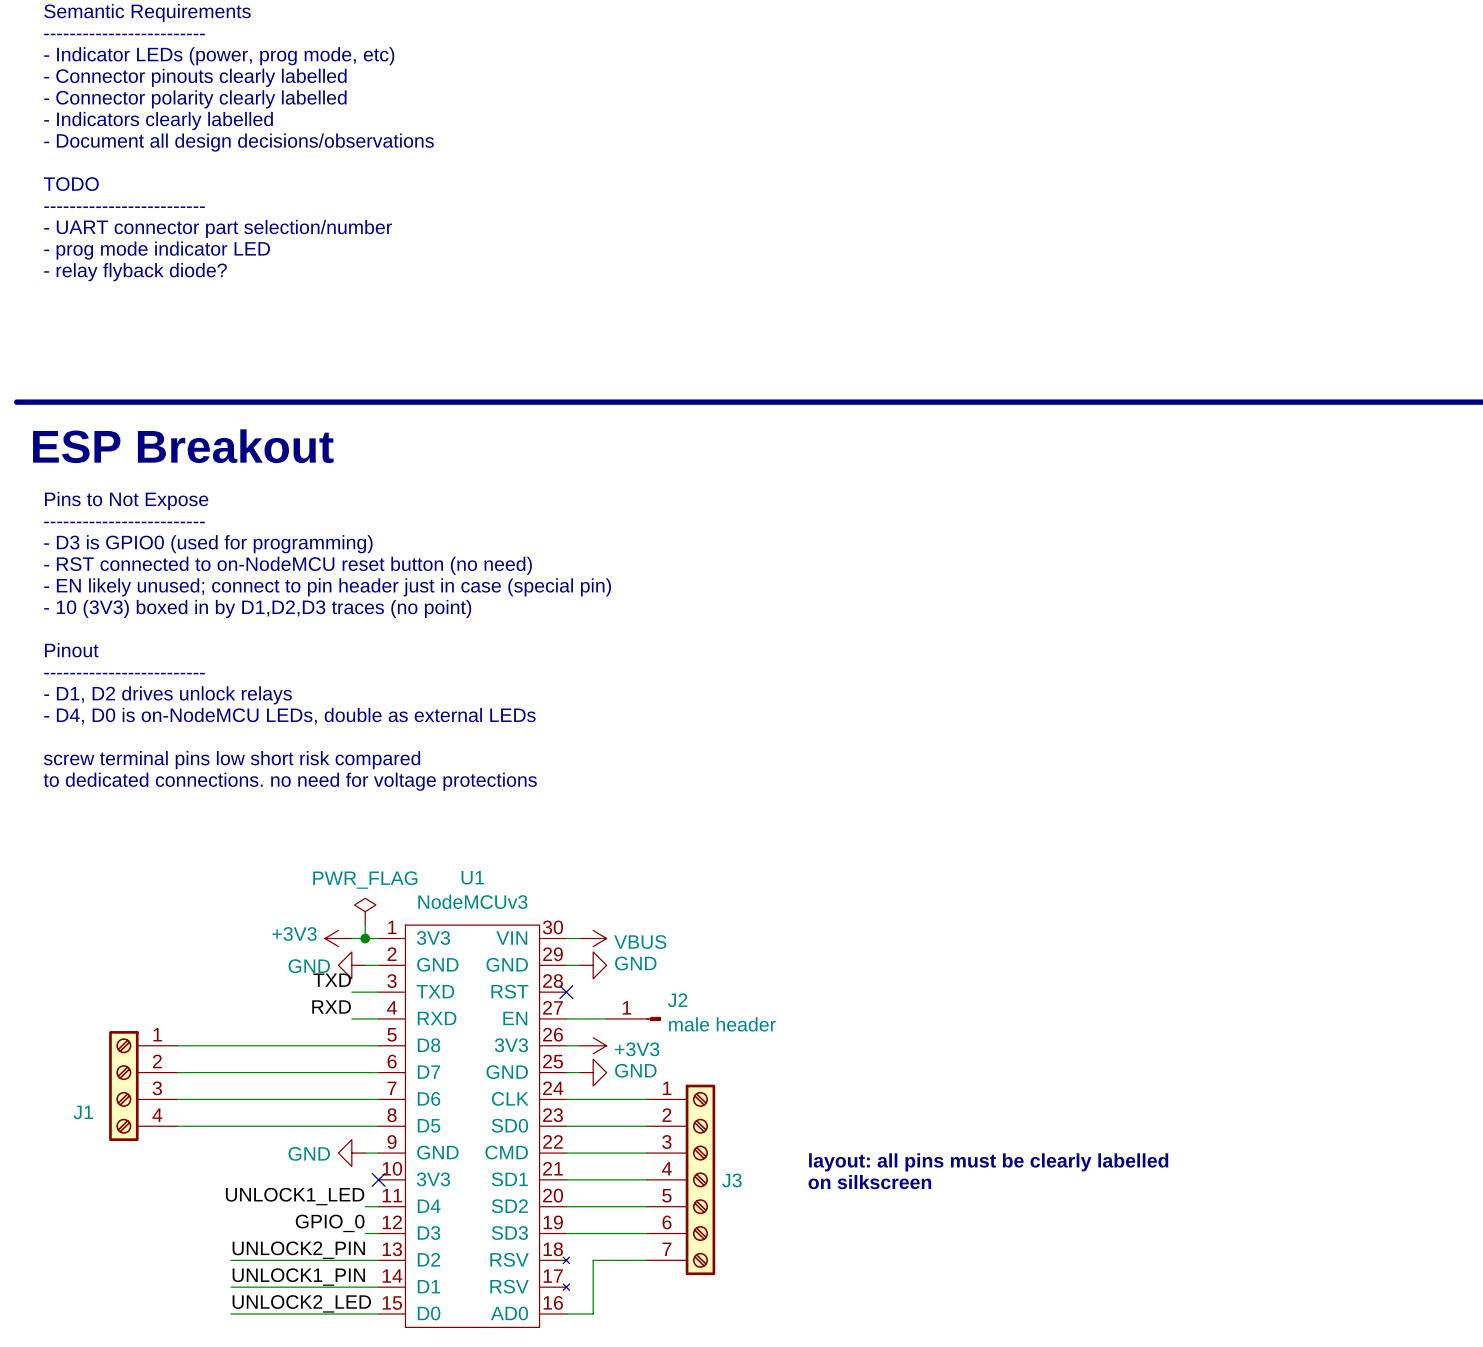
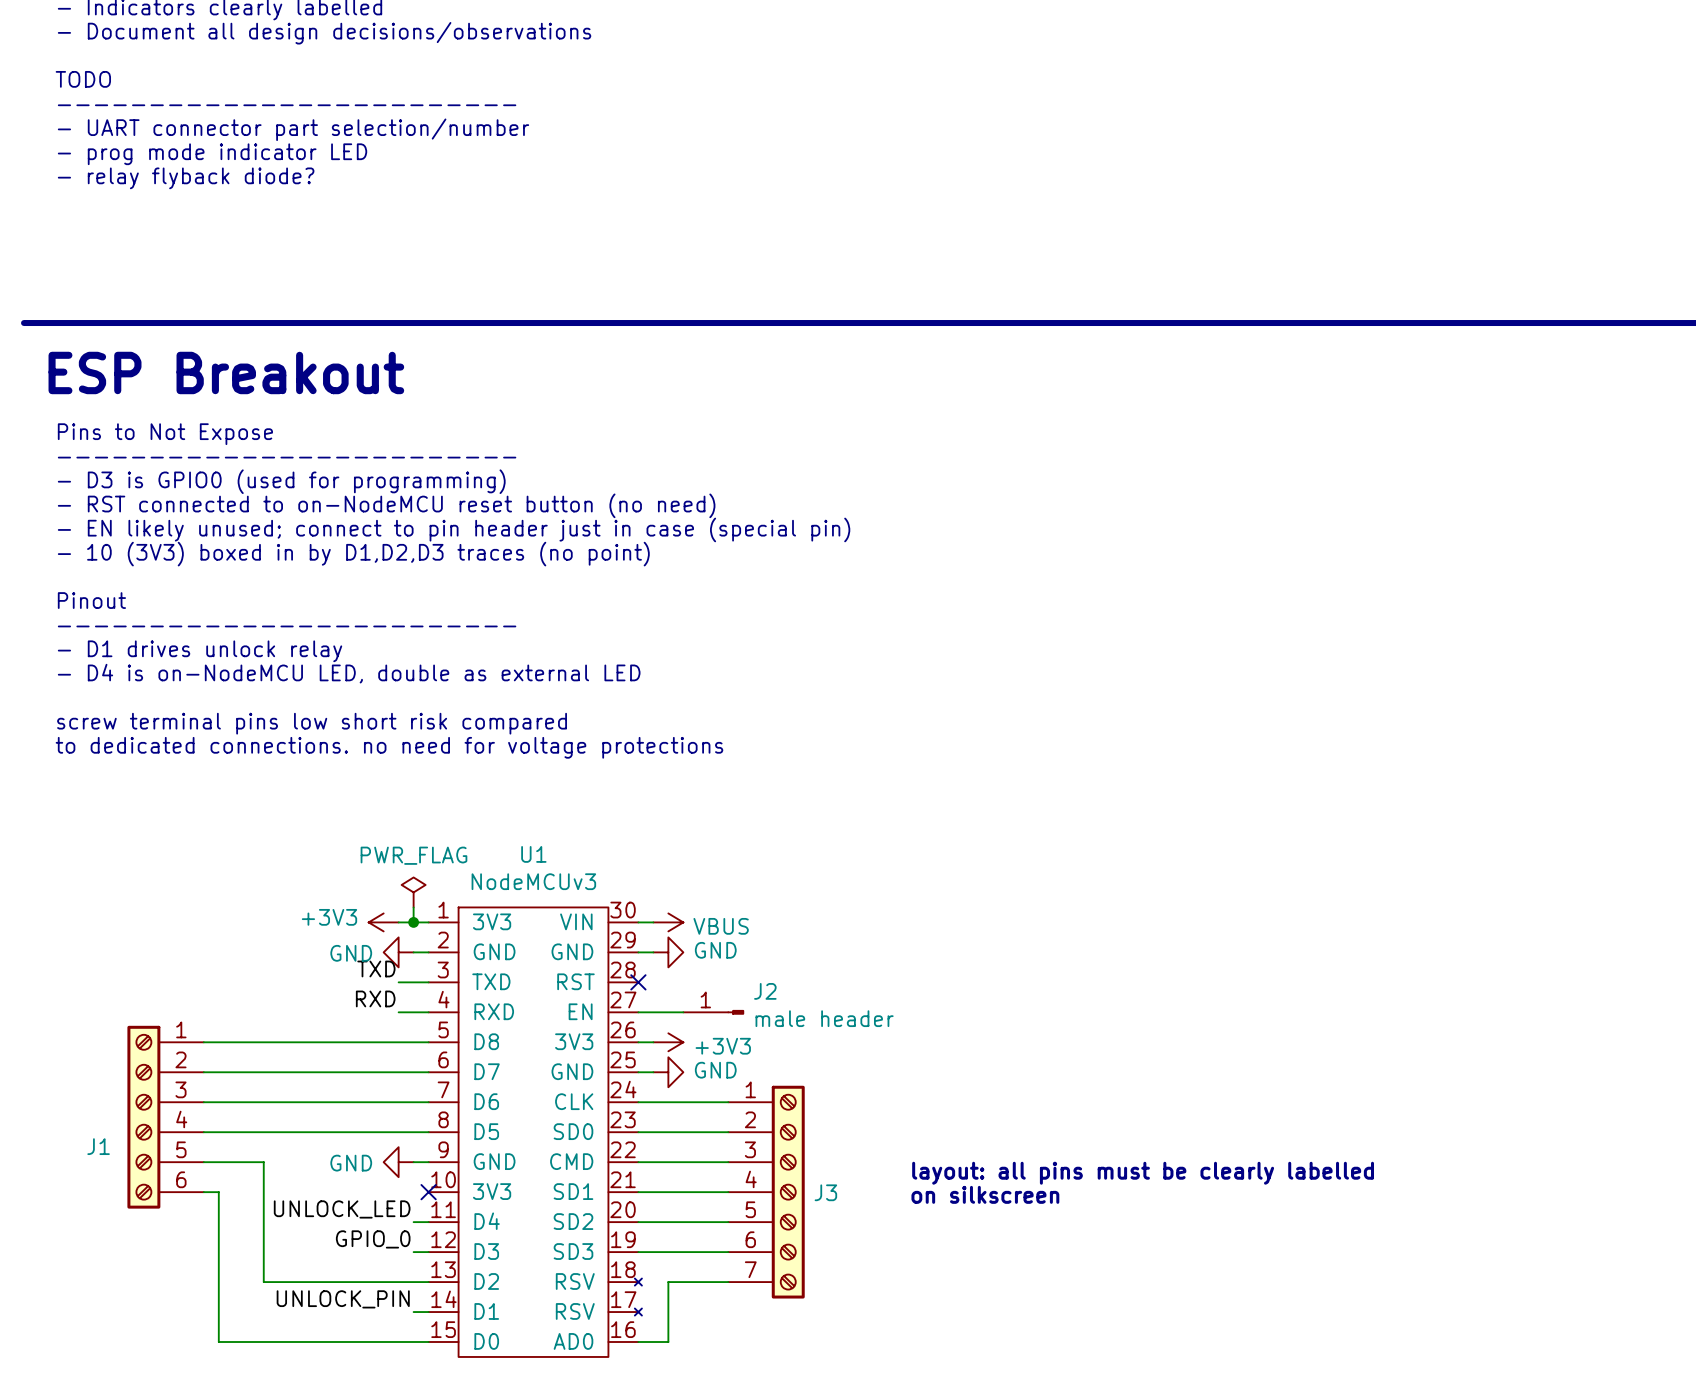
text: - D1, D2 drives unlock relays (168, 695) -> - D1 drives unlock relay (200, 651)
text: - D4, D0 is on-NodeMCU LEDs, double as external LEDs (289, 716) -> - D4 is on-NodeMCU LED, double as external LED (349, 673)
J1 symbol: [109, 1031, 178, 1142] -> [127, 1025, 204, 1209]
wire: none -> (203, 1162) (263, 1162) (263, 1282)
wire: none -> (203, 1192) (218, 1192) (218, 1342) (263, 1342)
label: UNLOCK1_LED (295, 1196) -> UNLOCK_LED (342, 1209)
label: UNLOCK2_PIN (298, 1250) -> none
label: UNLOCK1_PIN (298, 1277) -> none
label: none -> UNLOCK_PIN (343, 1299)
wire: (231, 1287) (365, 1287) -> none
label: UNLOCK2_LED (301, 1303) -> none

